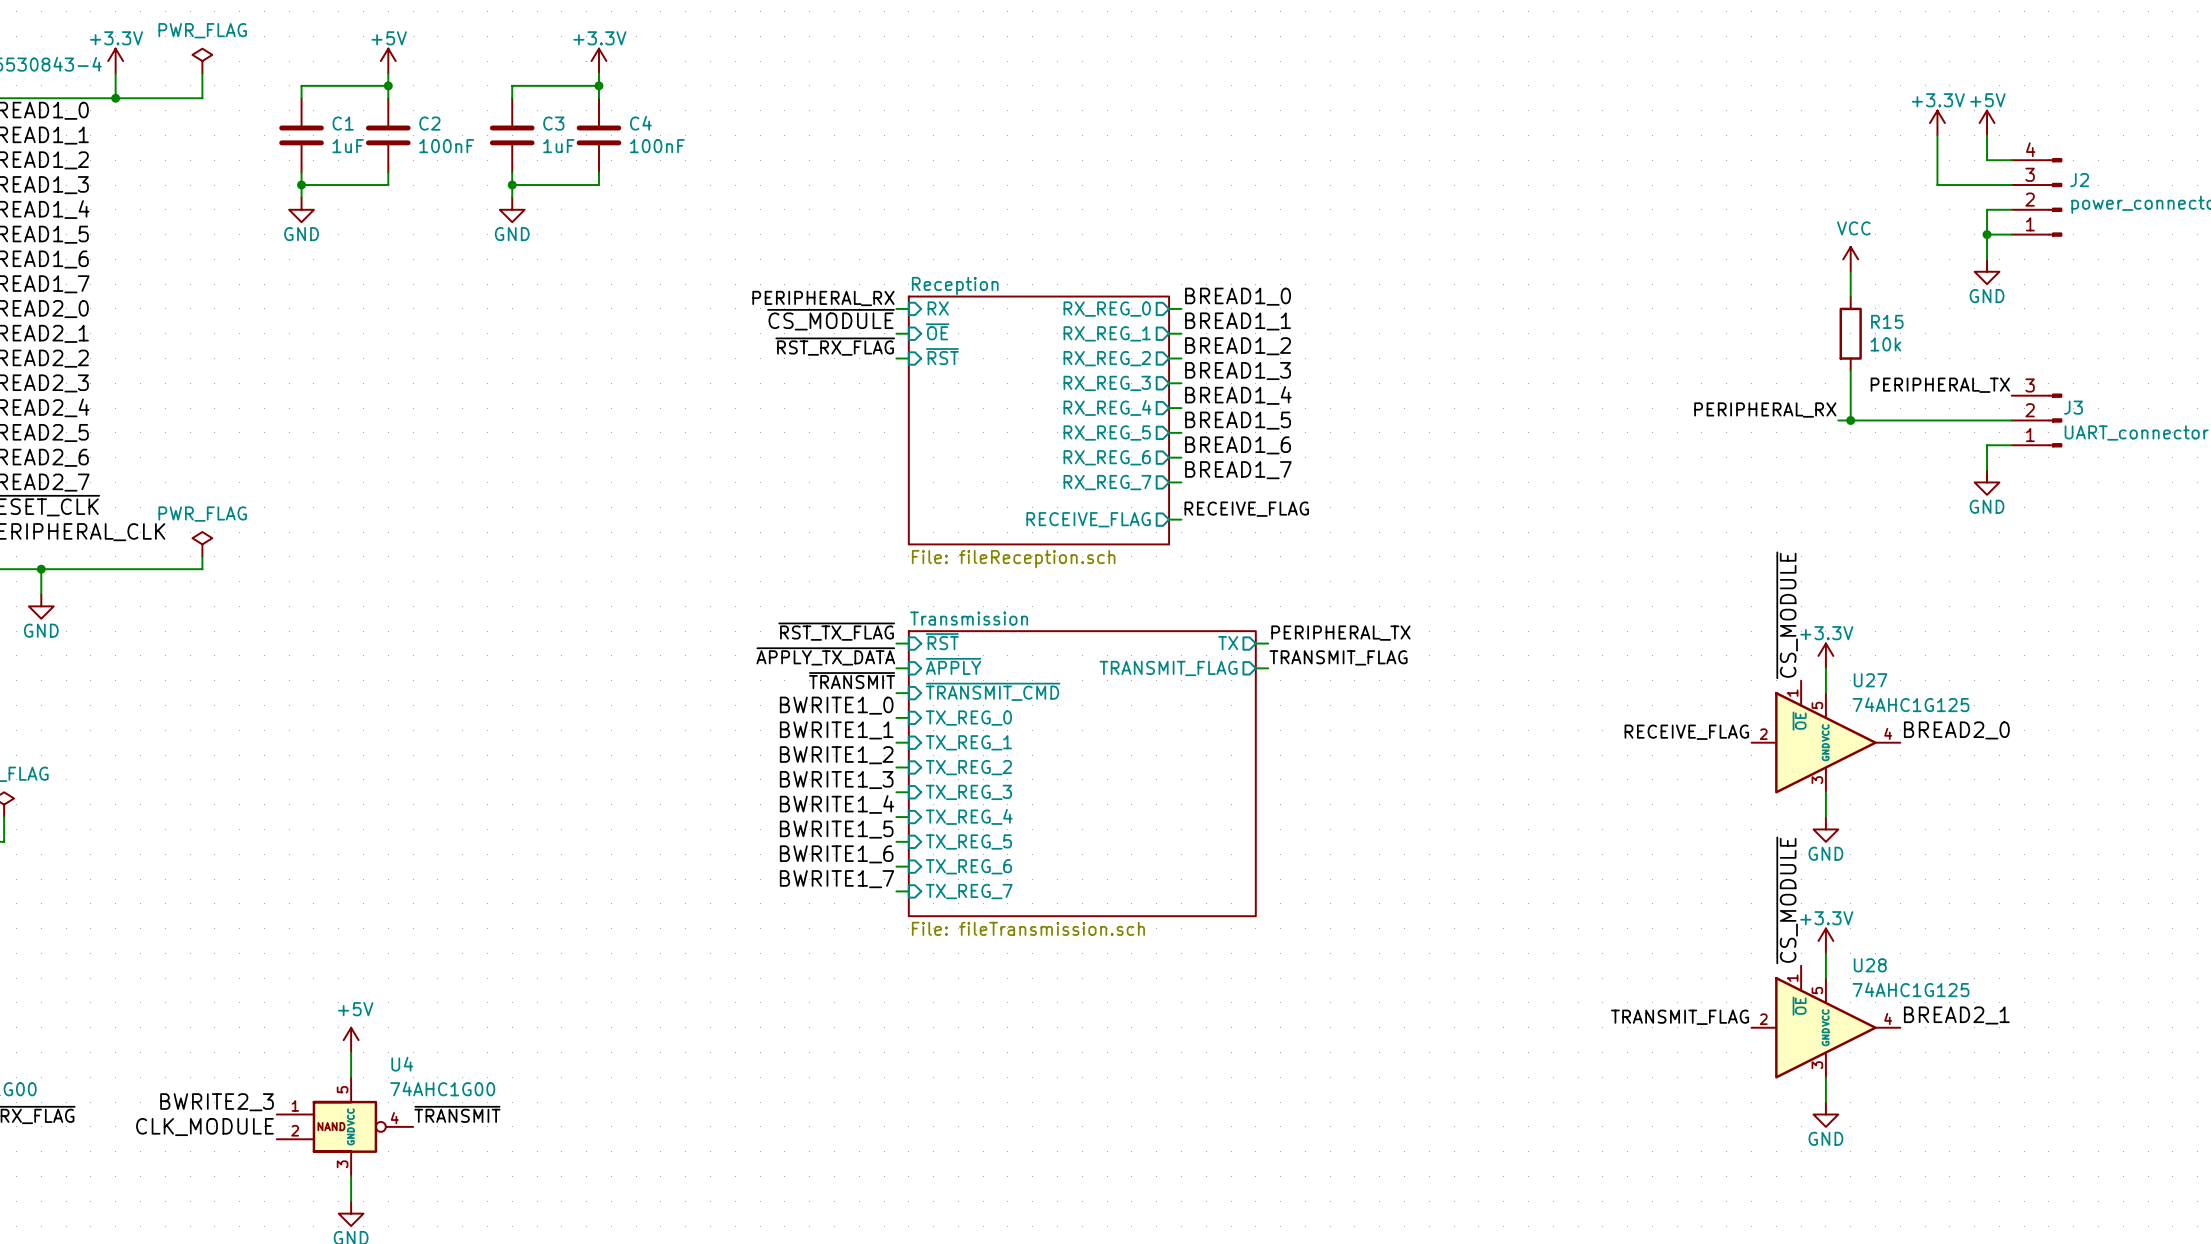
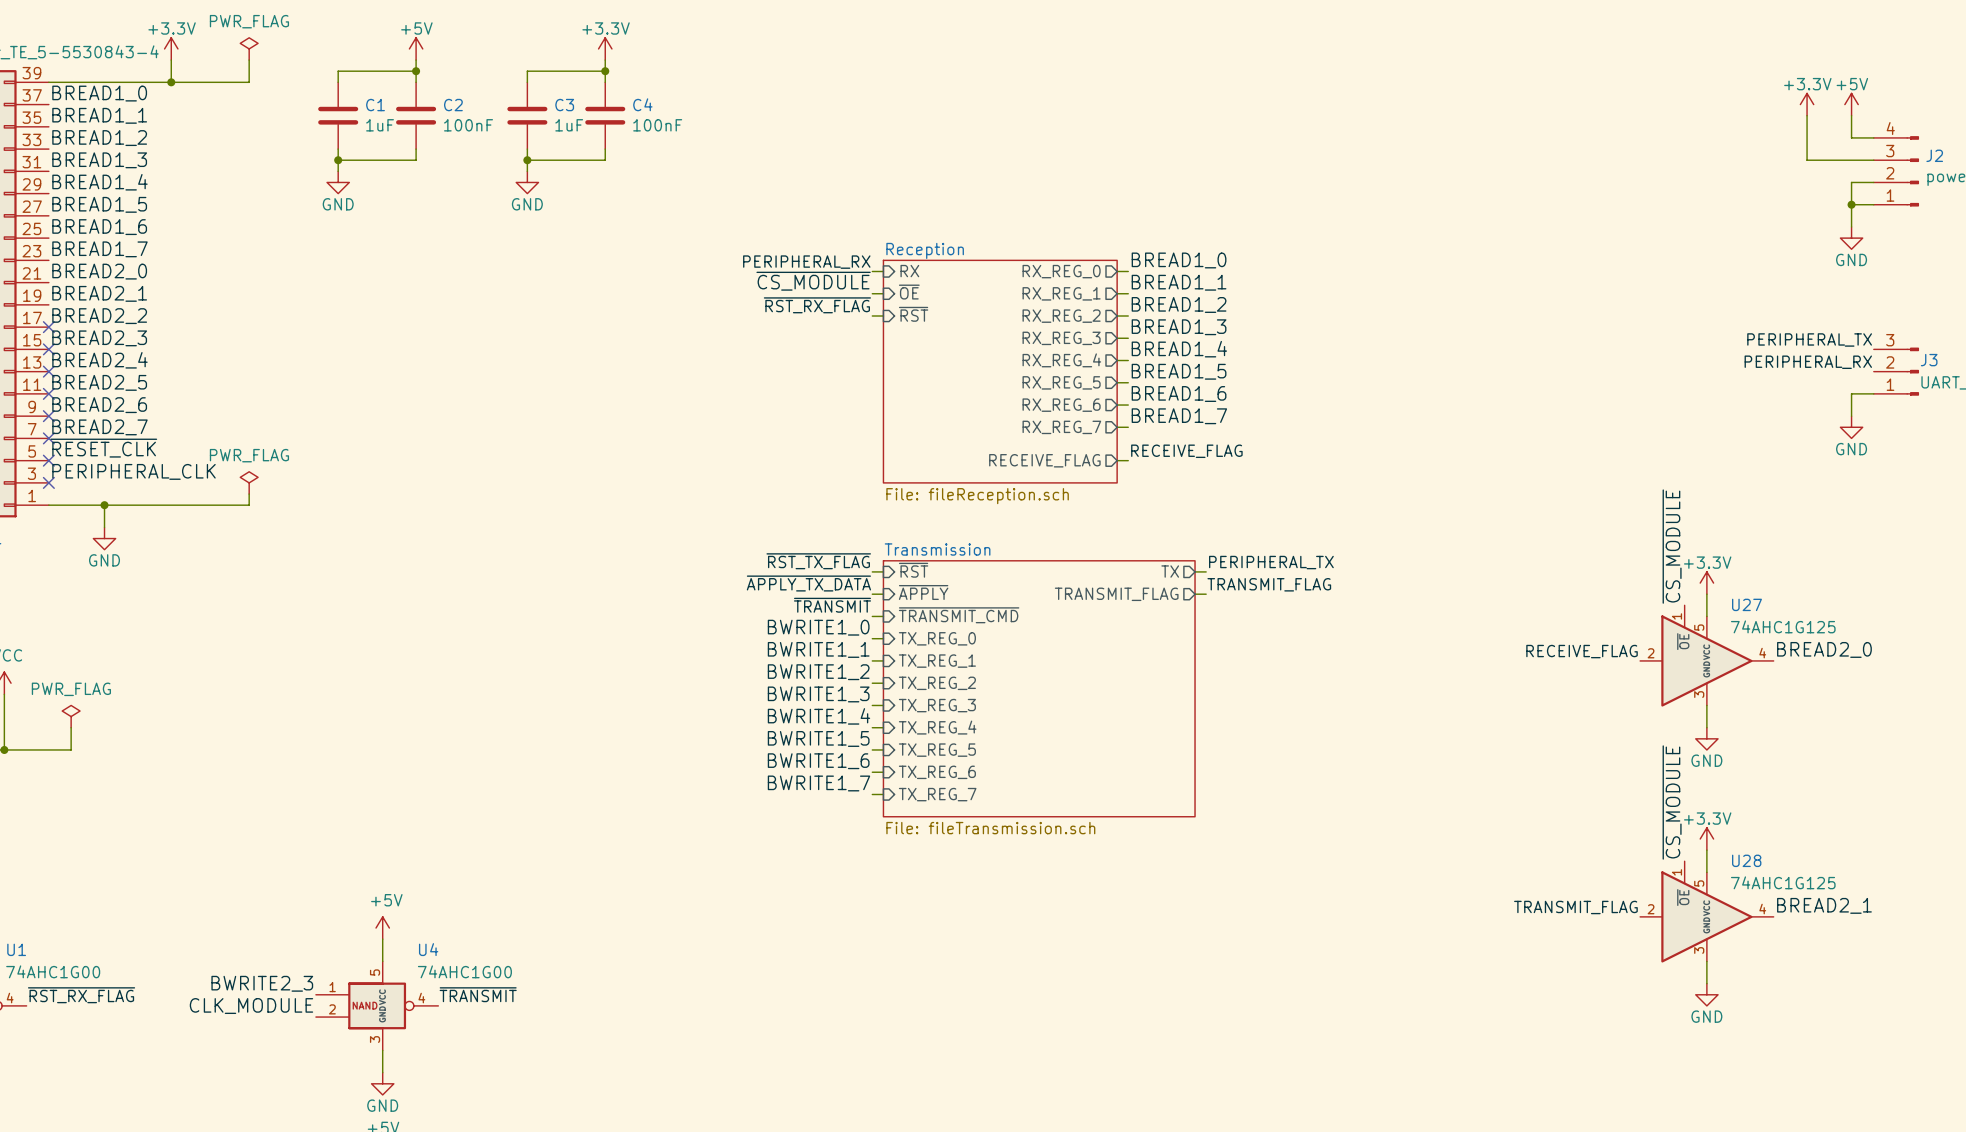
power symbol: VCC (1850, 259) -> none
wire: (1850, 271) (1850, 296) -> none
R15: 10k (1850, 333) -> none
wire: (1850, 370) (1850, 420) -> none
label position: PERIPHERAL_RX (1765, 410) -> PERIPHERAL_RX (1808, 362)
wire: (1838, 420) (2011, 420) -> none
junction: (1850, 420) -> none

